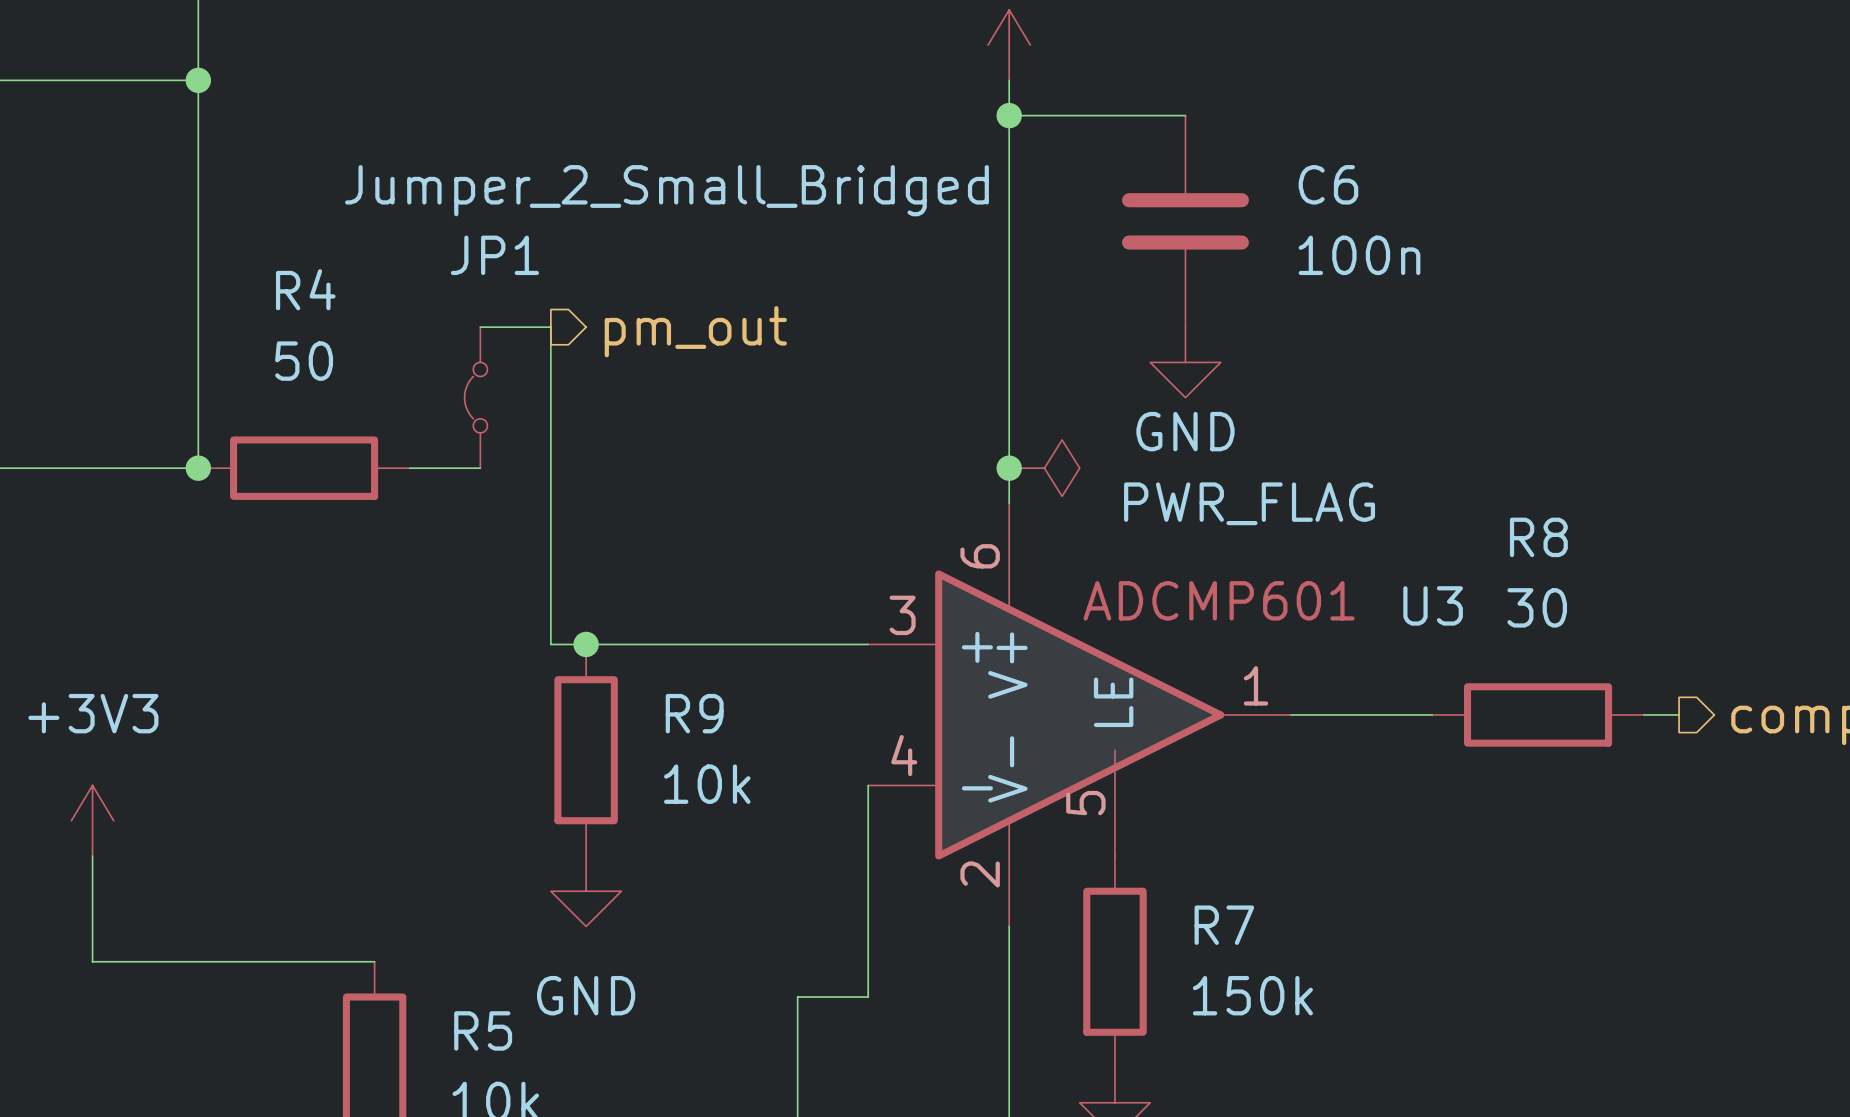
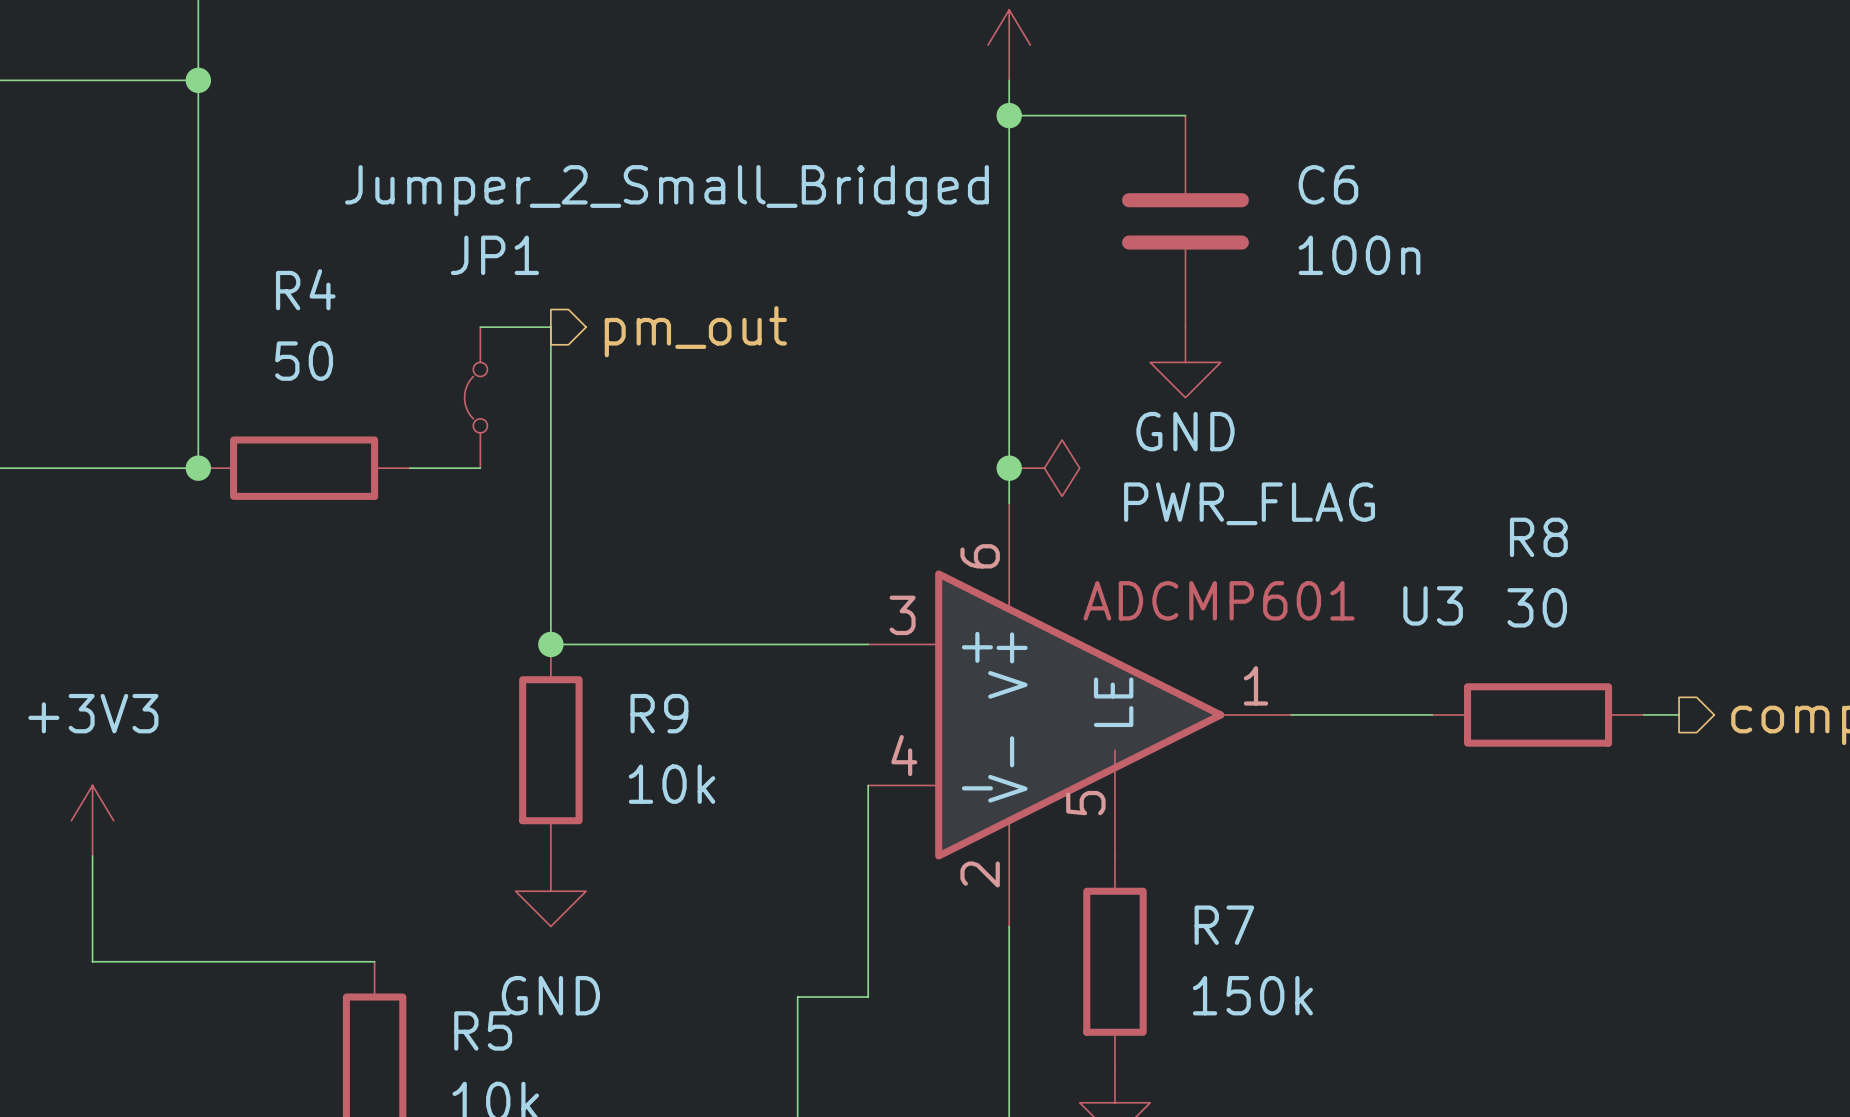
junction position: (586, 644) -> (550, 644)
R9 position: (586, 750) -> (550, 750)
power symbol position: GND (586, 891) -> GND (550, 891)

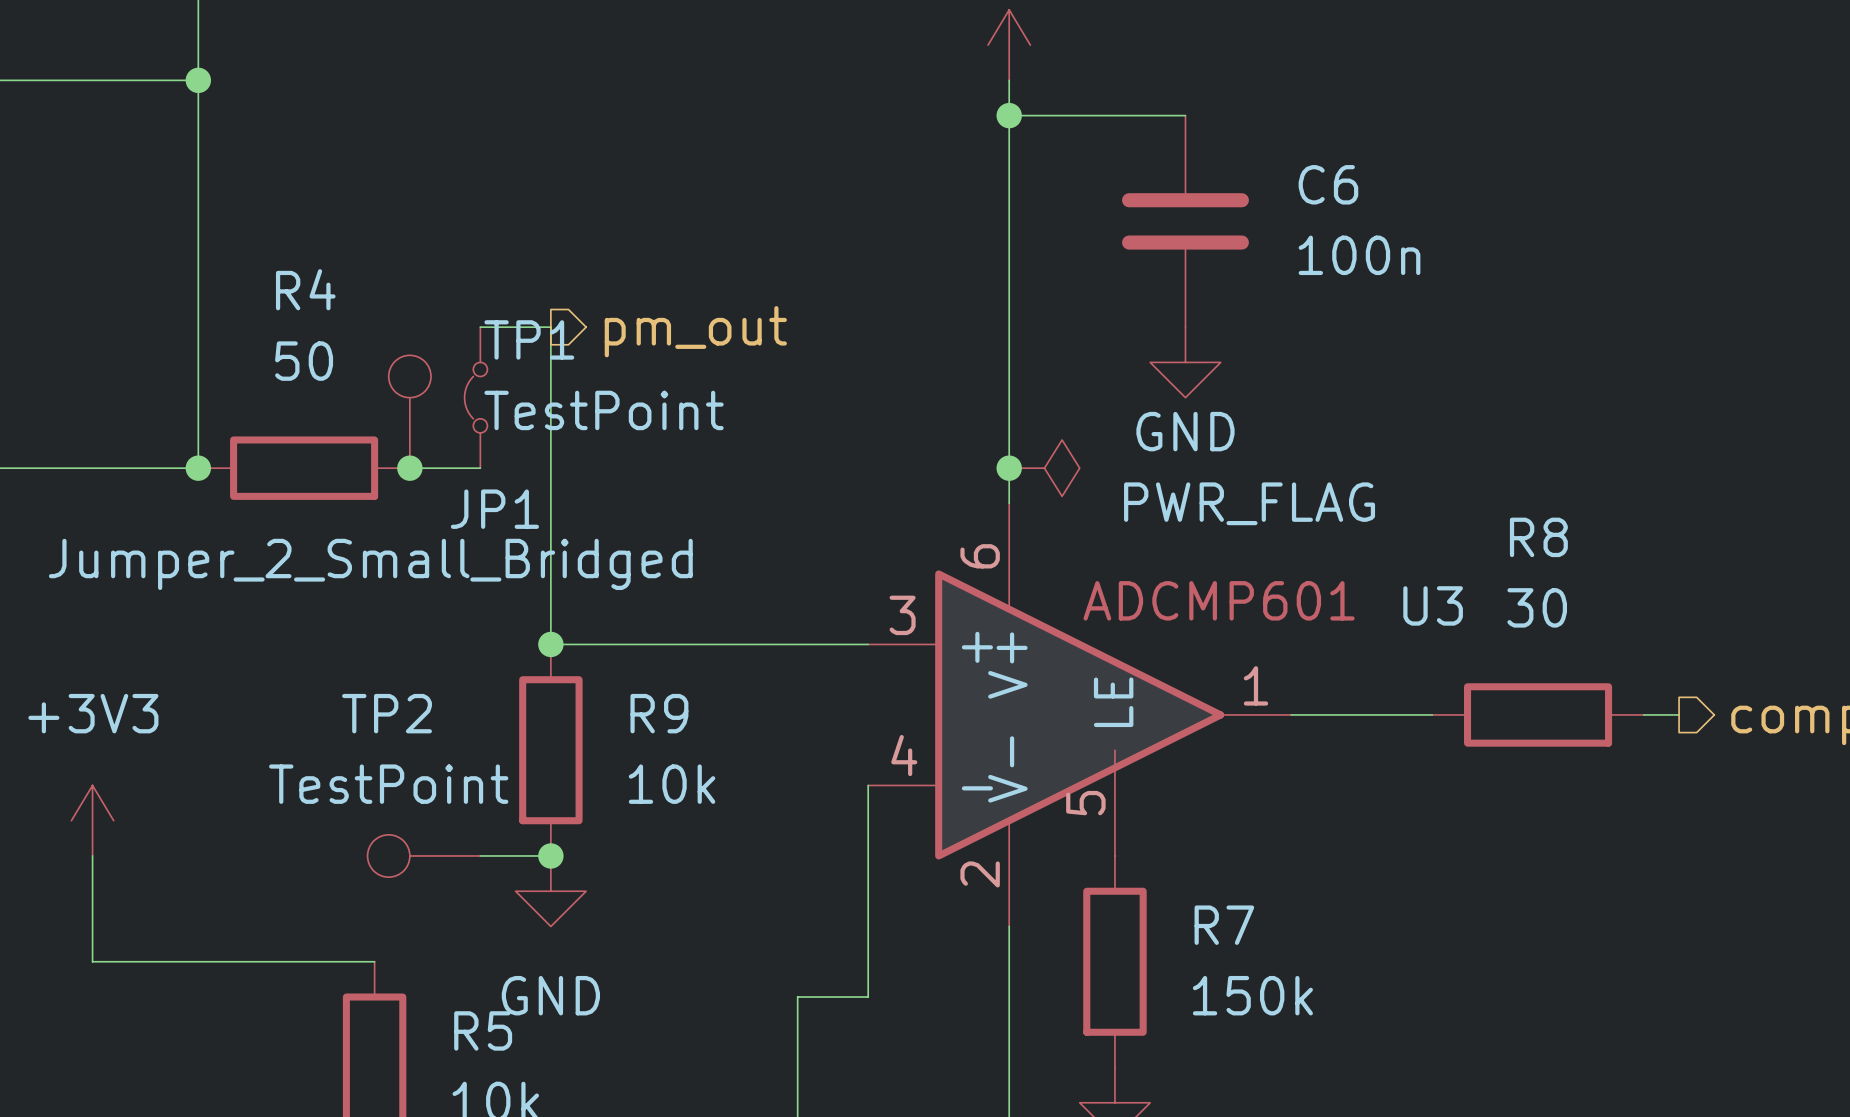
JP1 value position: Jumper_2_Small_Bridged (666, 190) -> Jumper_2_Small_Bridged (370, 564)
JP1 name position: JP1 (494, 255) -> JP1 (494, 509)
TP1: none -> TestPoint (409, 411)
junction: none -> (409, 468)
TP2: none -> TestPoint (423, 855)
wire: none -> (480, 855) (550, 855)
junction: none -> (550, 855)

